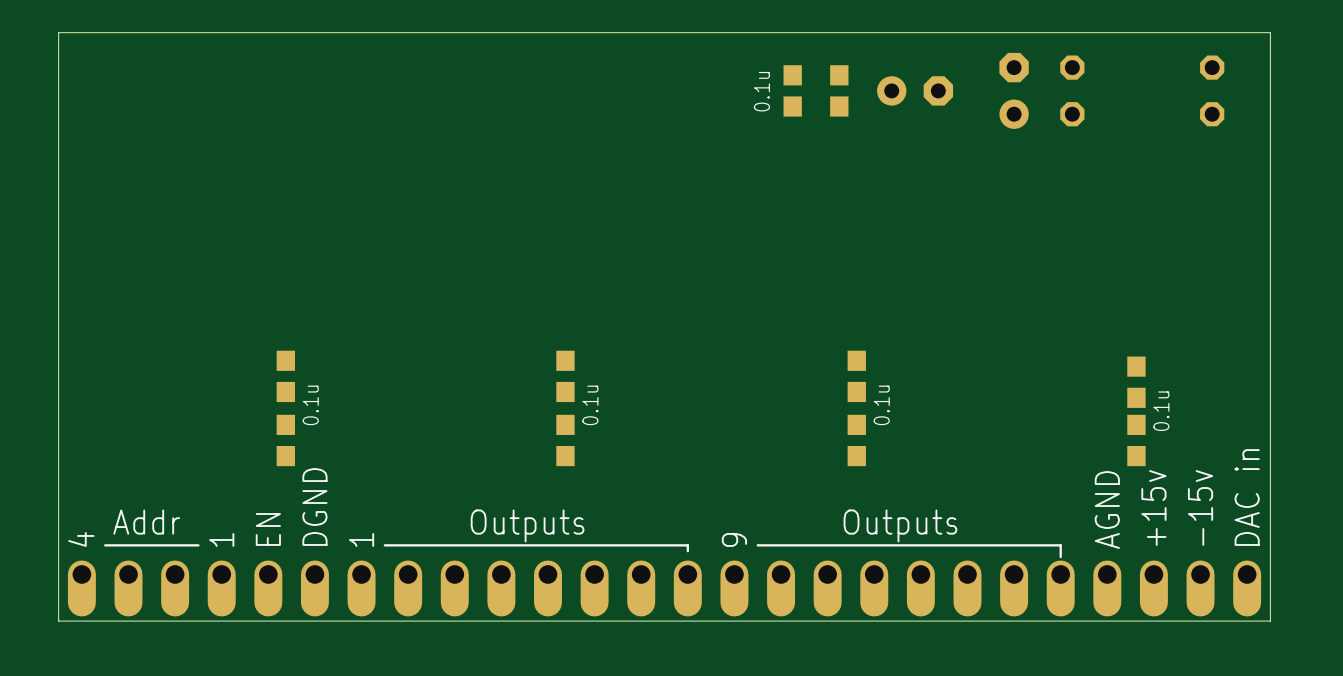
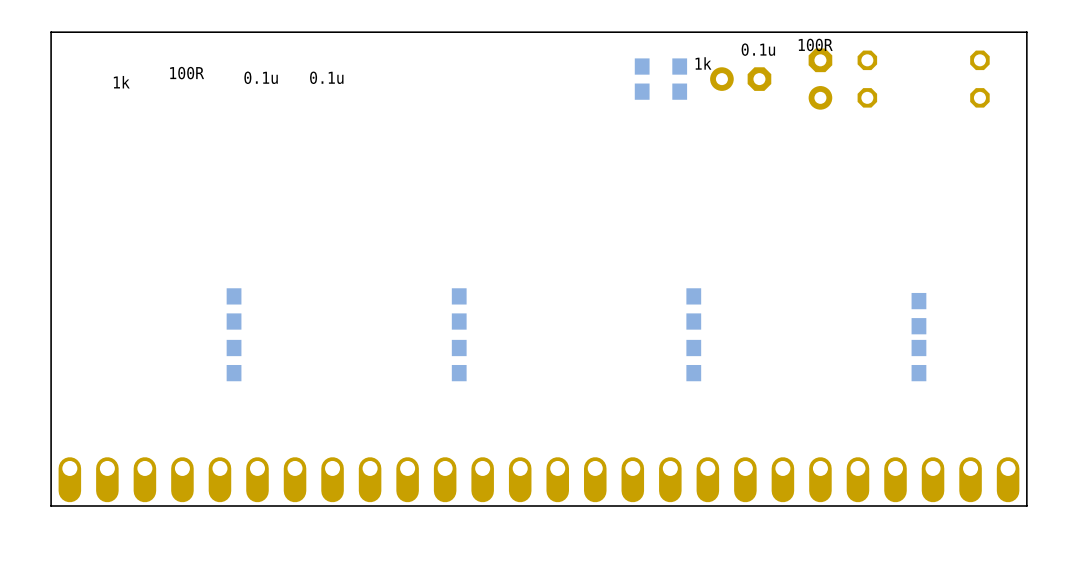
text: none -> 100R (815, 44)
text: none -> 1k (703, 63)
text: none -> 100R (187, 73)
text: none -> 0.1u (261, 77)
text: none -> 0.1u (326, 77)
text rotation: 0° (761, 91) -> 90° clockwise (758, 49)
text position: 0.1u (761, 91) -> 0.1u (758, 49)
text: none -> 1k (121, 82)
text: 0.1u (310, 405) -> none
text: 0.1u (590, 405) -> none
text: 0.1u (881, 405) -> none
text: 0.1u (1161, 411) -> none
text: DAC in (1247, 497) -> none
text: DGND (314, 507) -> none
text: +15v (1153, 508) -> none
text: -15v (1200, 508) -> none
text: AGND (1107, 510) -> none
text: Addr (146, 522) -> none
text: Outputs (527, 525) -> none
text: Outputs (900, 525) -> none
text: EN (268, 529) -> none
text: 4 (81, 539) -> none
text: 1 (221, 539) -> none
text: 1 (361, 539) -> none
text: 9 (734, 539) -> none
line: (198, 545) (105, 545) -> none
line: (384, 545) (687, 545) (687, 551) -> none
line: (757, 545) (1060, 545) (1060, 557) -> none

